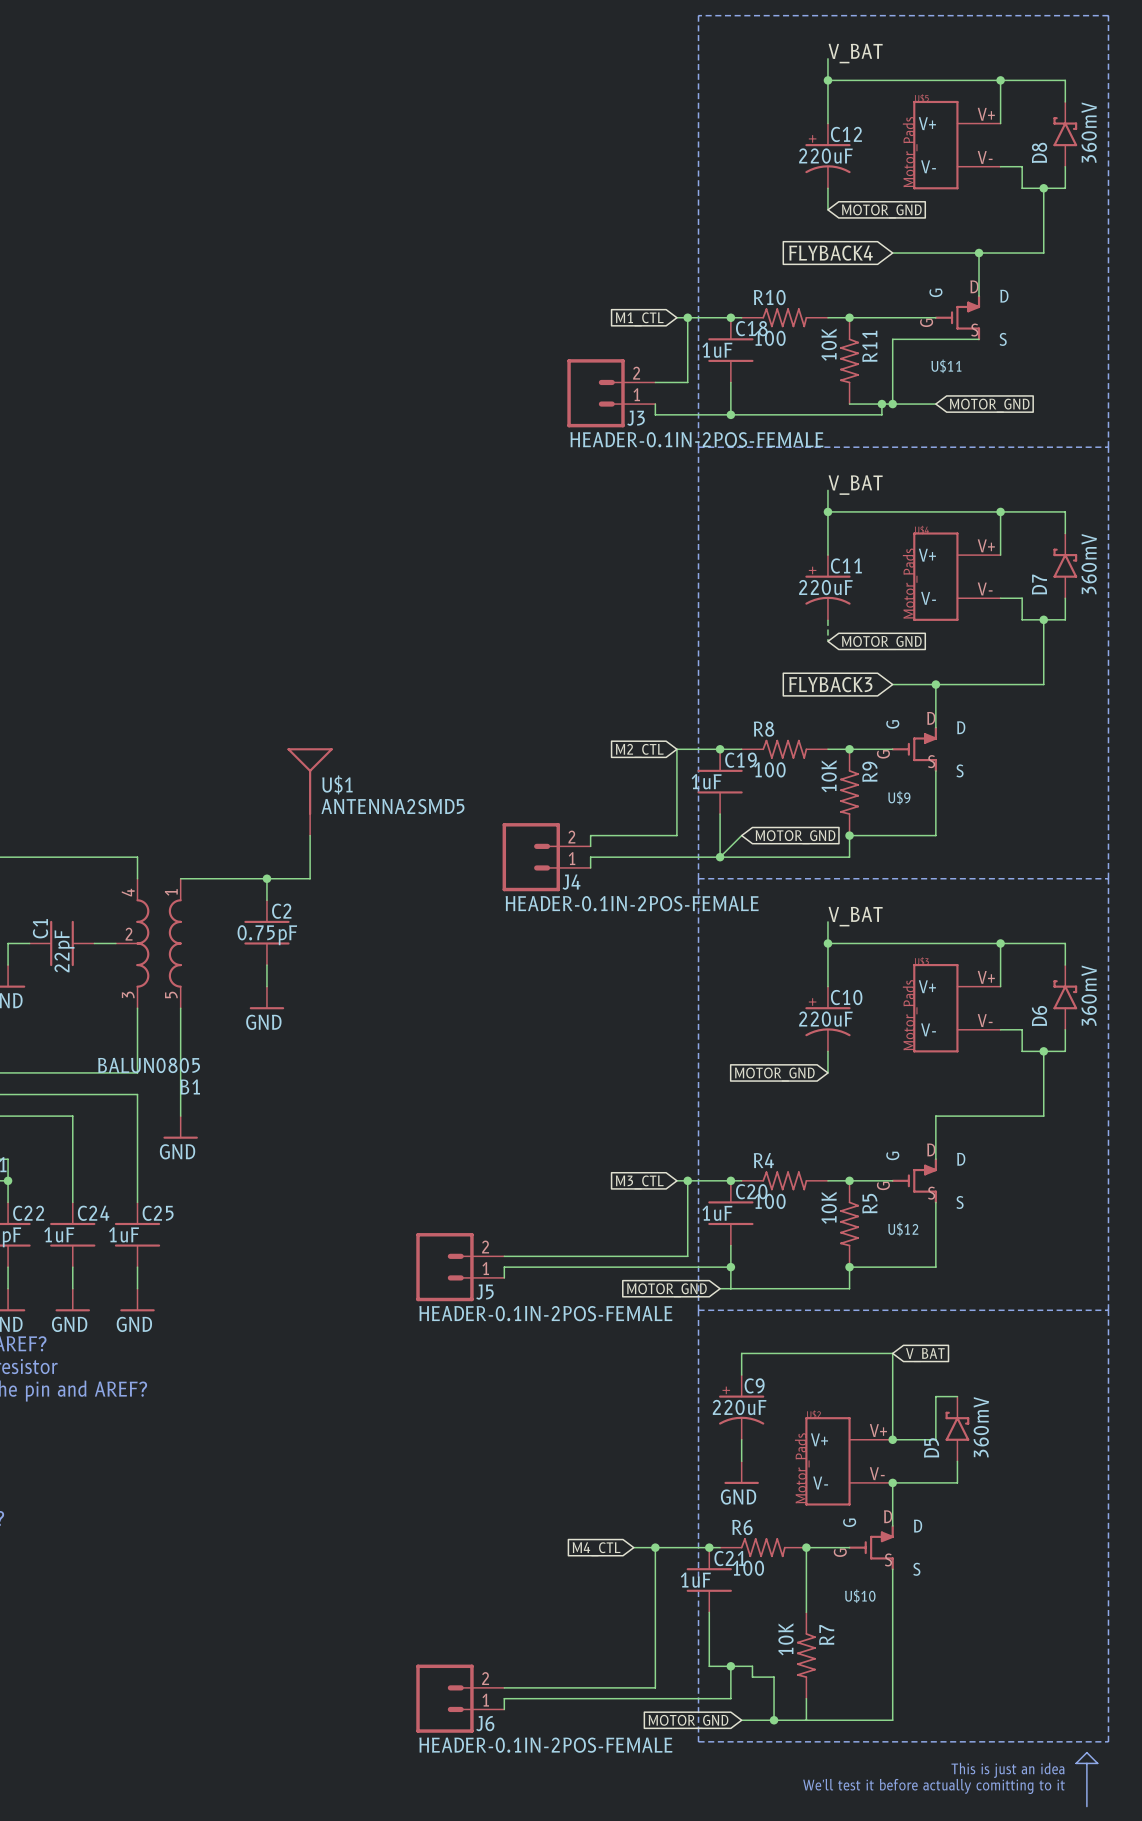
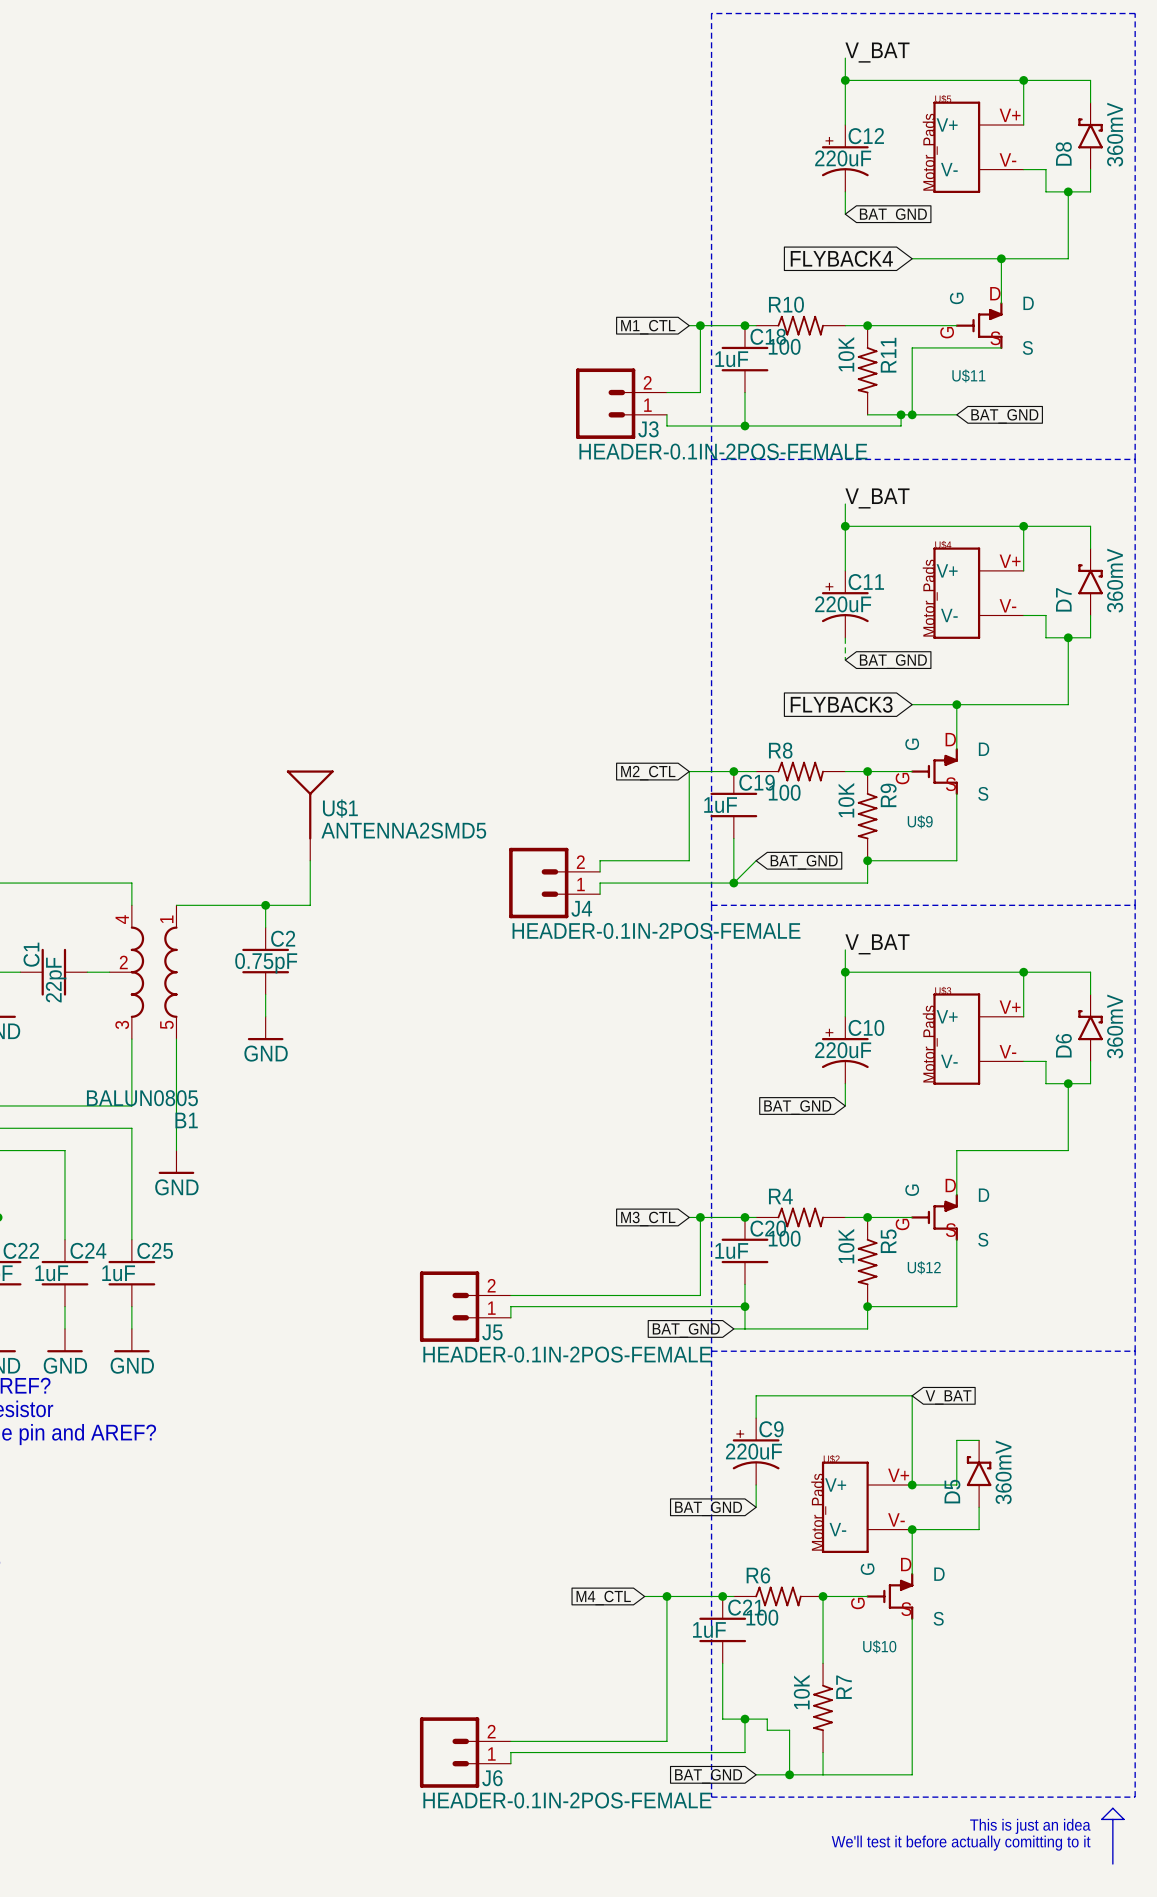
global label: MOTOR_GND (881, 211) -> BAT_GND (893, 215)
global label: MOTOR_GND (989, 405) -> BAT_GND (1004, 416)
global label: MOTOR_GND (881, 643) -> BAT_GND (893, 661)
global label: MOTOR_GND (795, 837) -> BAT_GND (804, 862)
global label: MOTOR_GND (774, 1074) -> BAT_GND (797, 1107)
global label: MOTOR_GND (666, 1290) -> BAT_GND (686, 1330)
global label: none -> BAT_GND (708, 1508)
power symbol: GND (741, 1472) -> none
global label: MOTOR_GND (688, 1721) -> BAT_GND (708, 1776)

